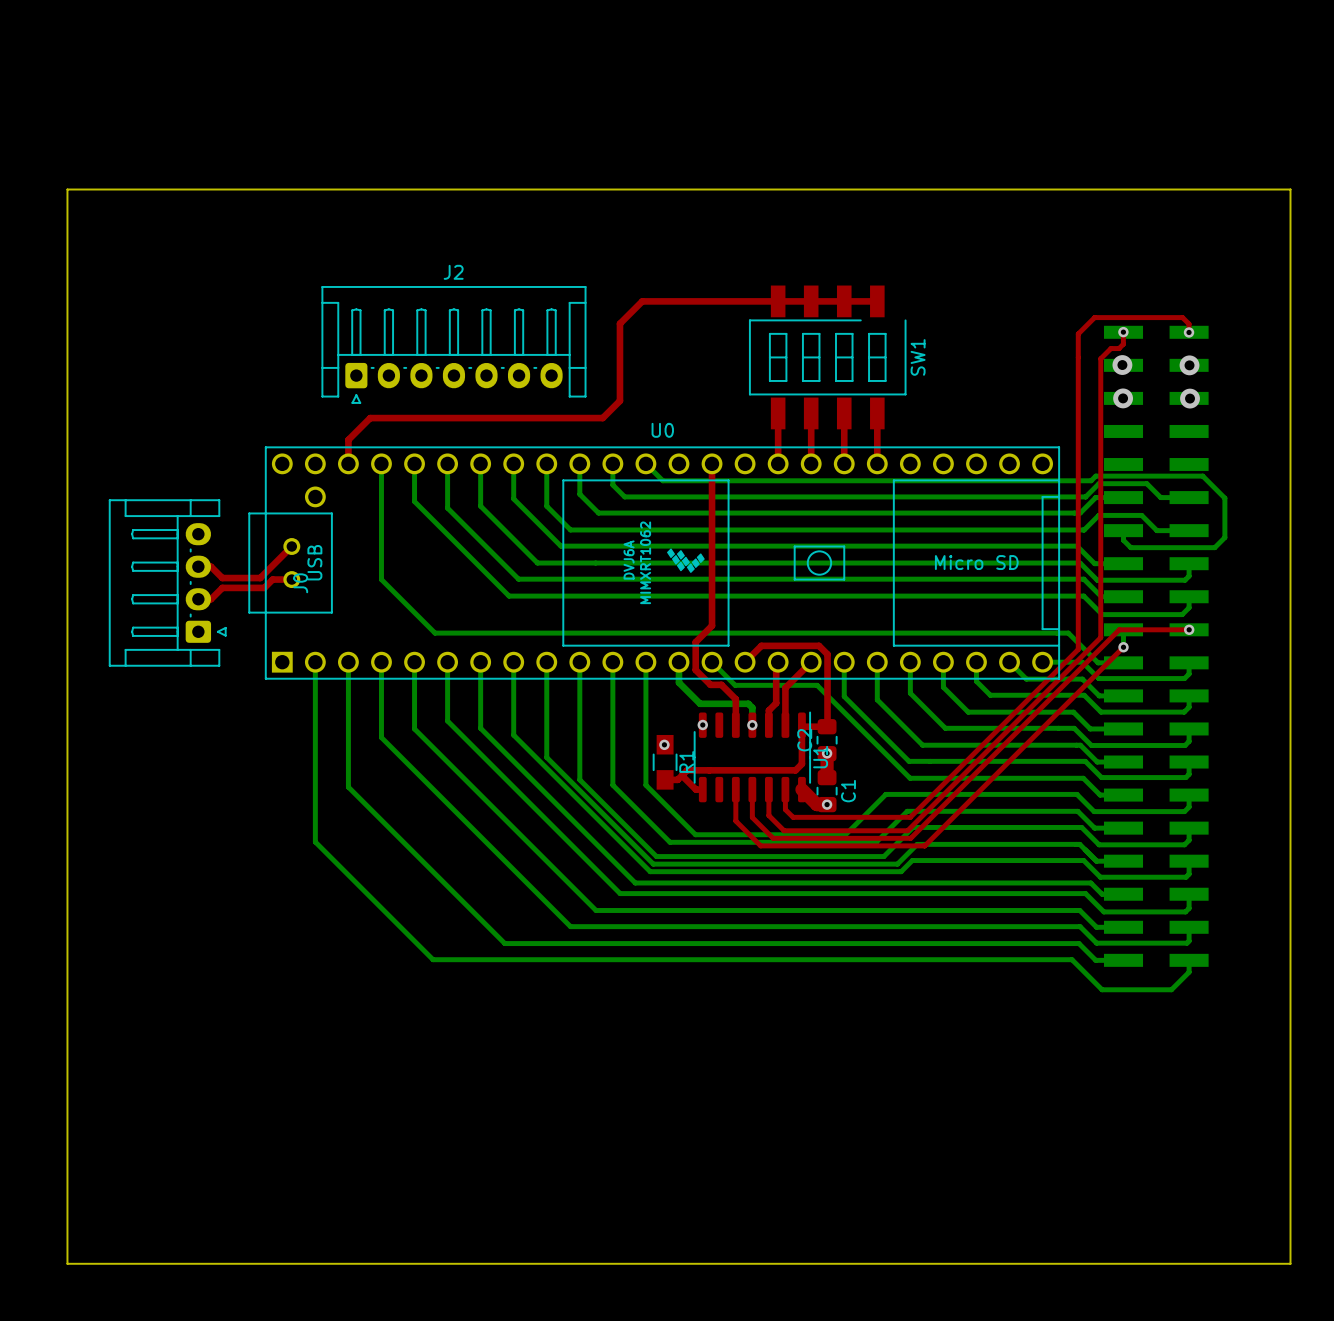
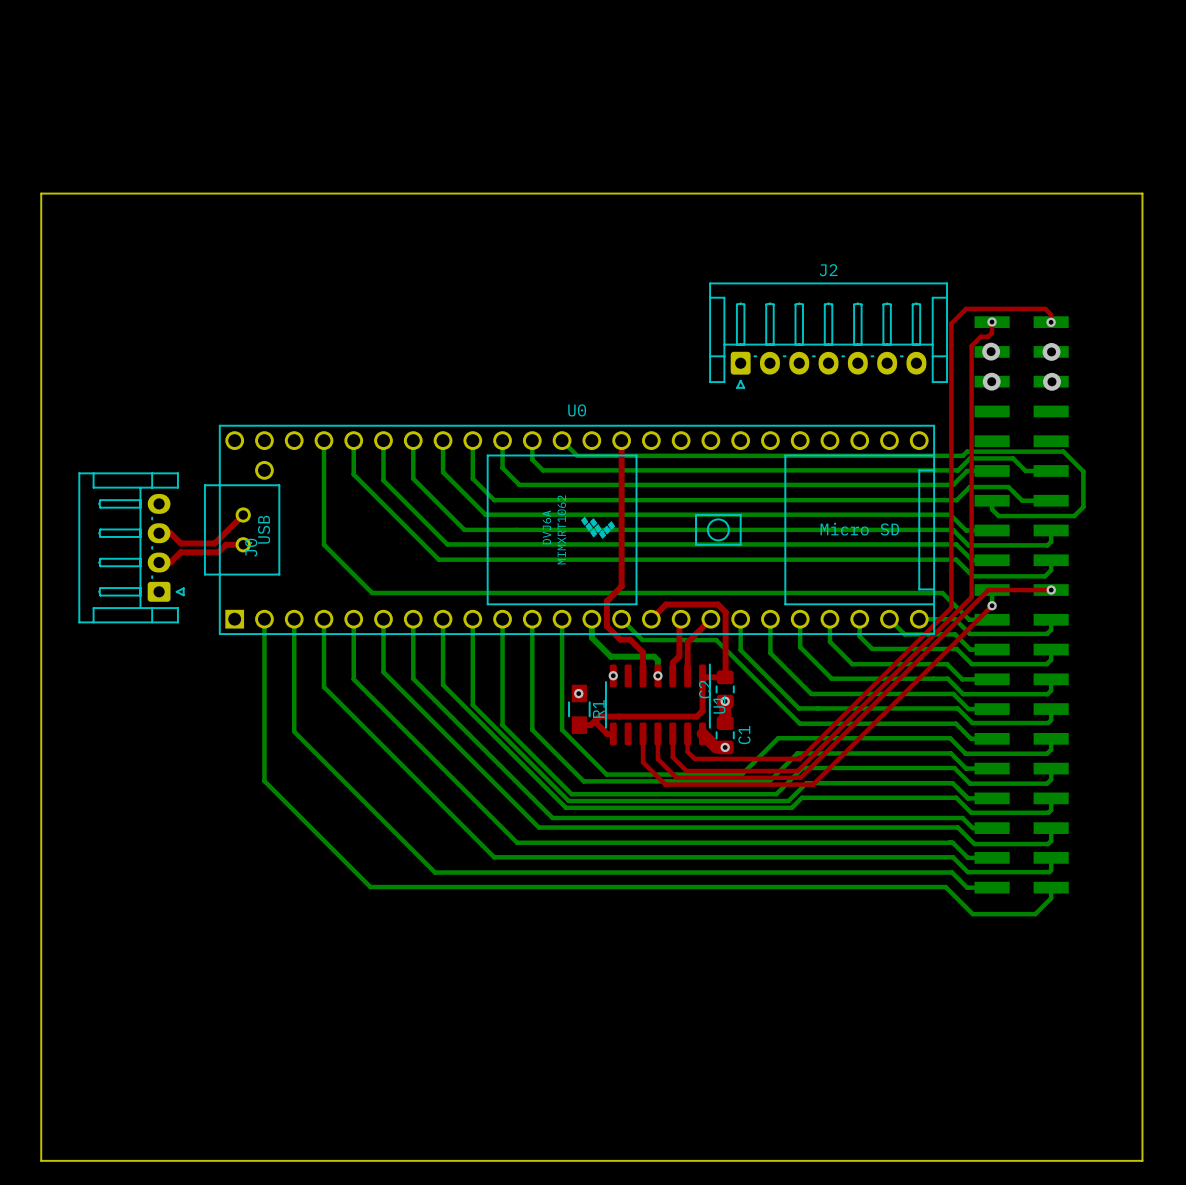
top track: (877, 301) (642, 301) (619, 323) (619, 400) (602, 418) (370, 418) (348, 439) (348, 463) -> none
J2 position: (453, 344) -> (828, 335)
SW1: (827, 357) -> none
top track: (778, 413) (778, 463) -> none
top track: (811, 413) (811, 463) -> none
top track: (844, 413) (844, 463) -> none
top track: (877, 413) (877, 463) -> none

